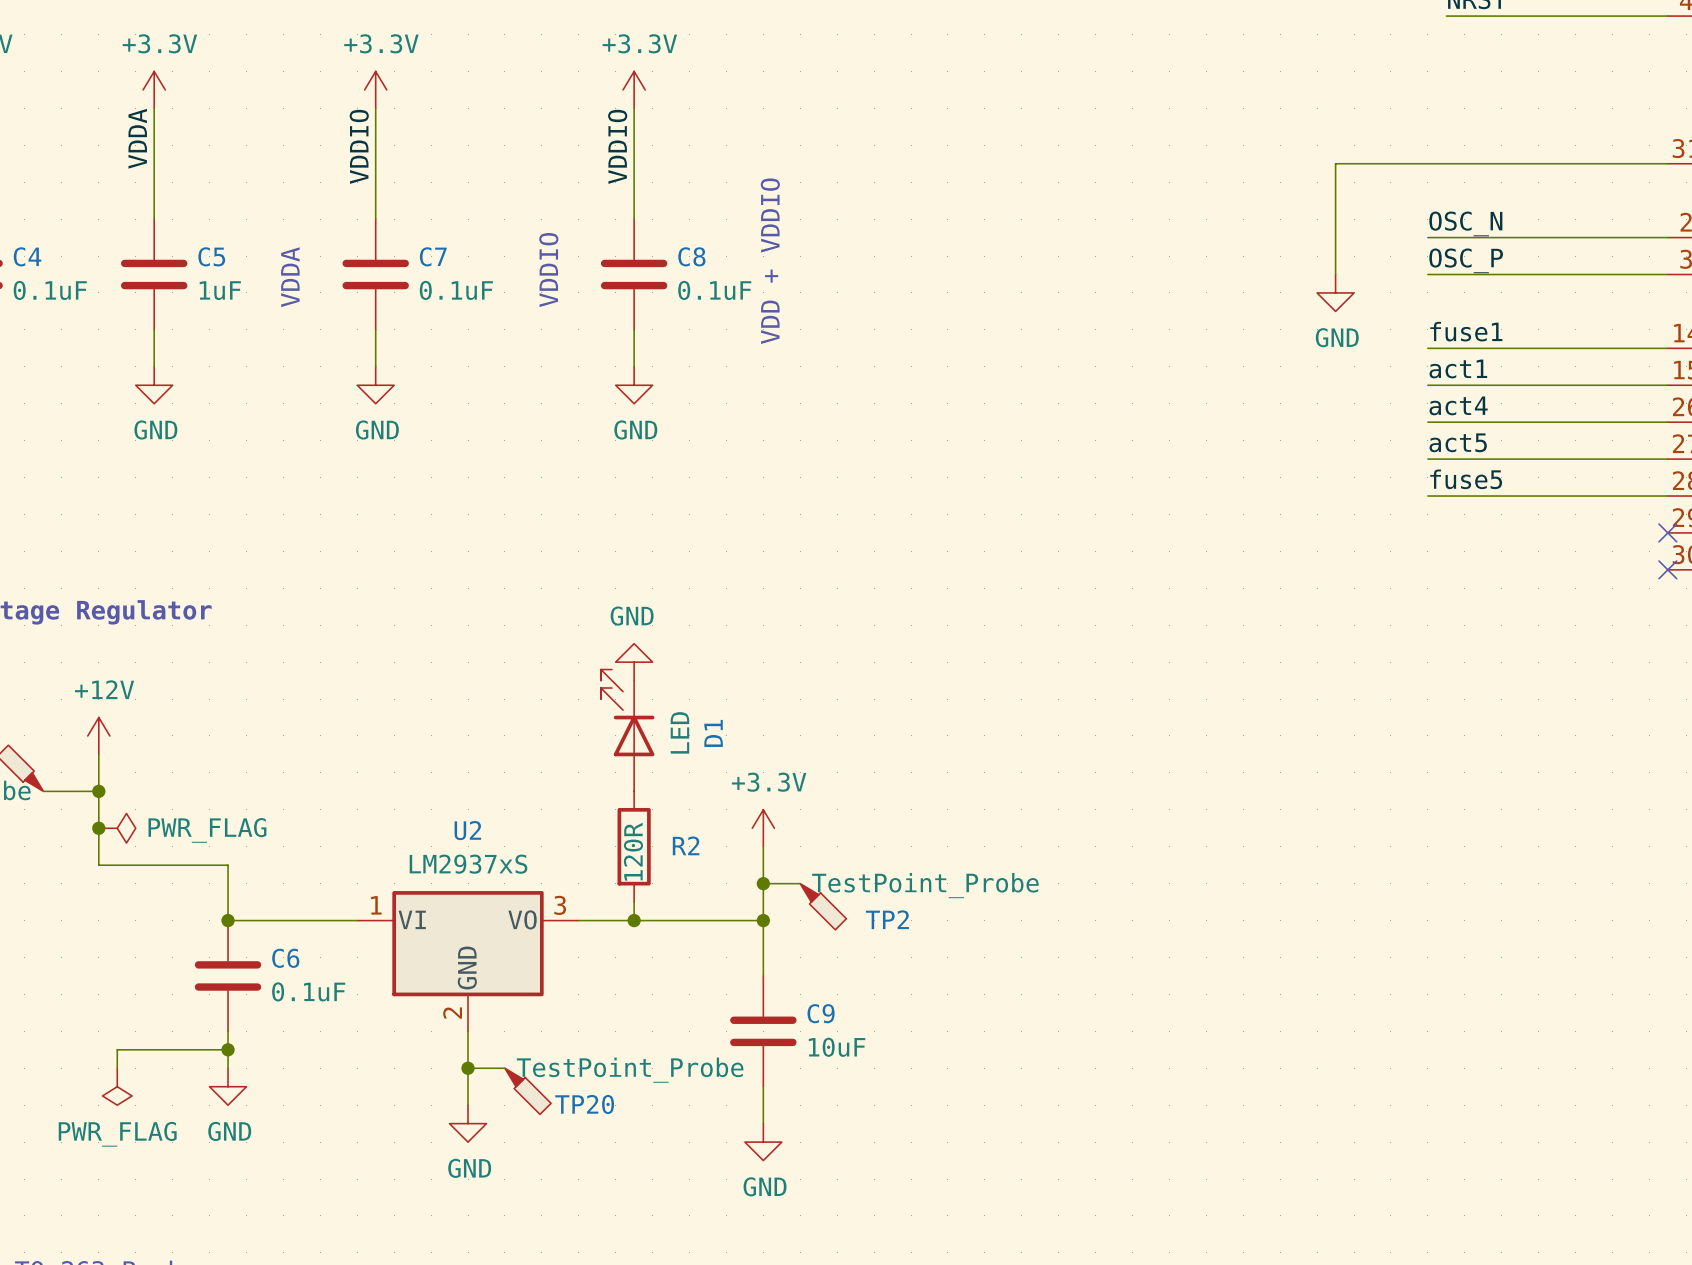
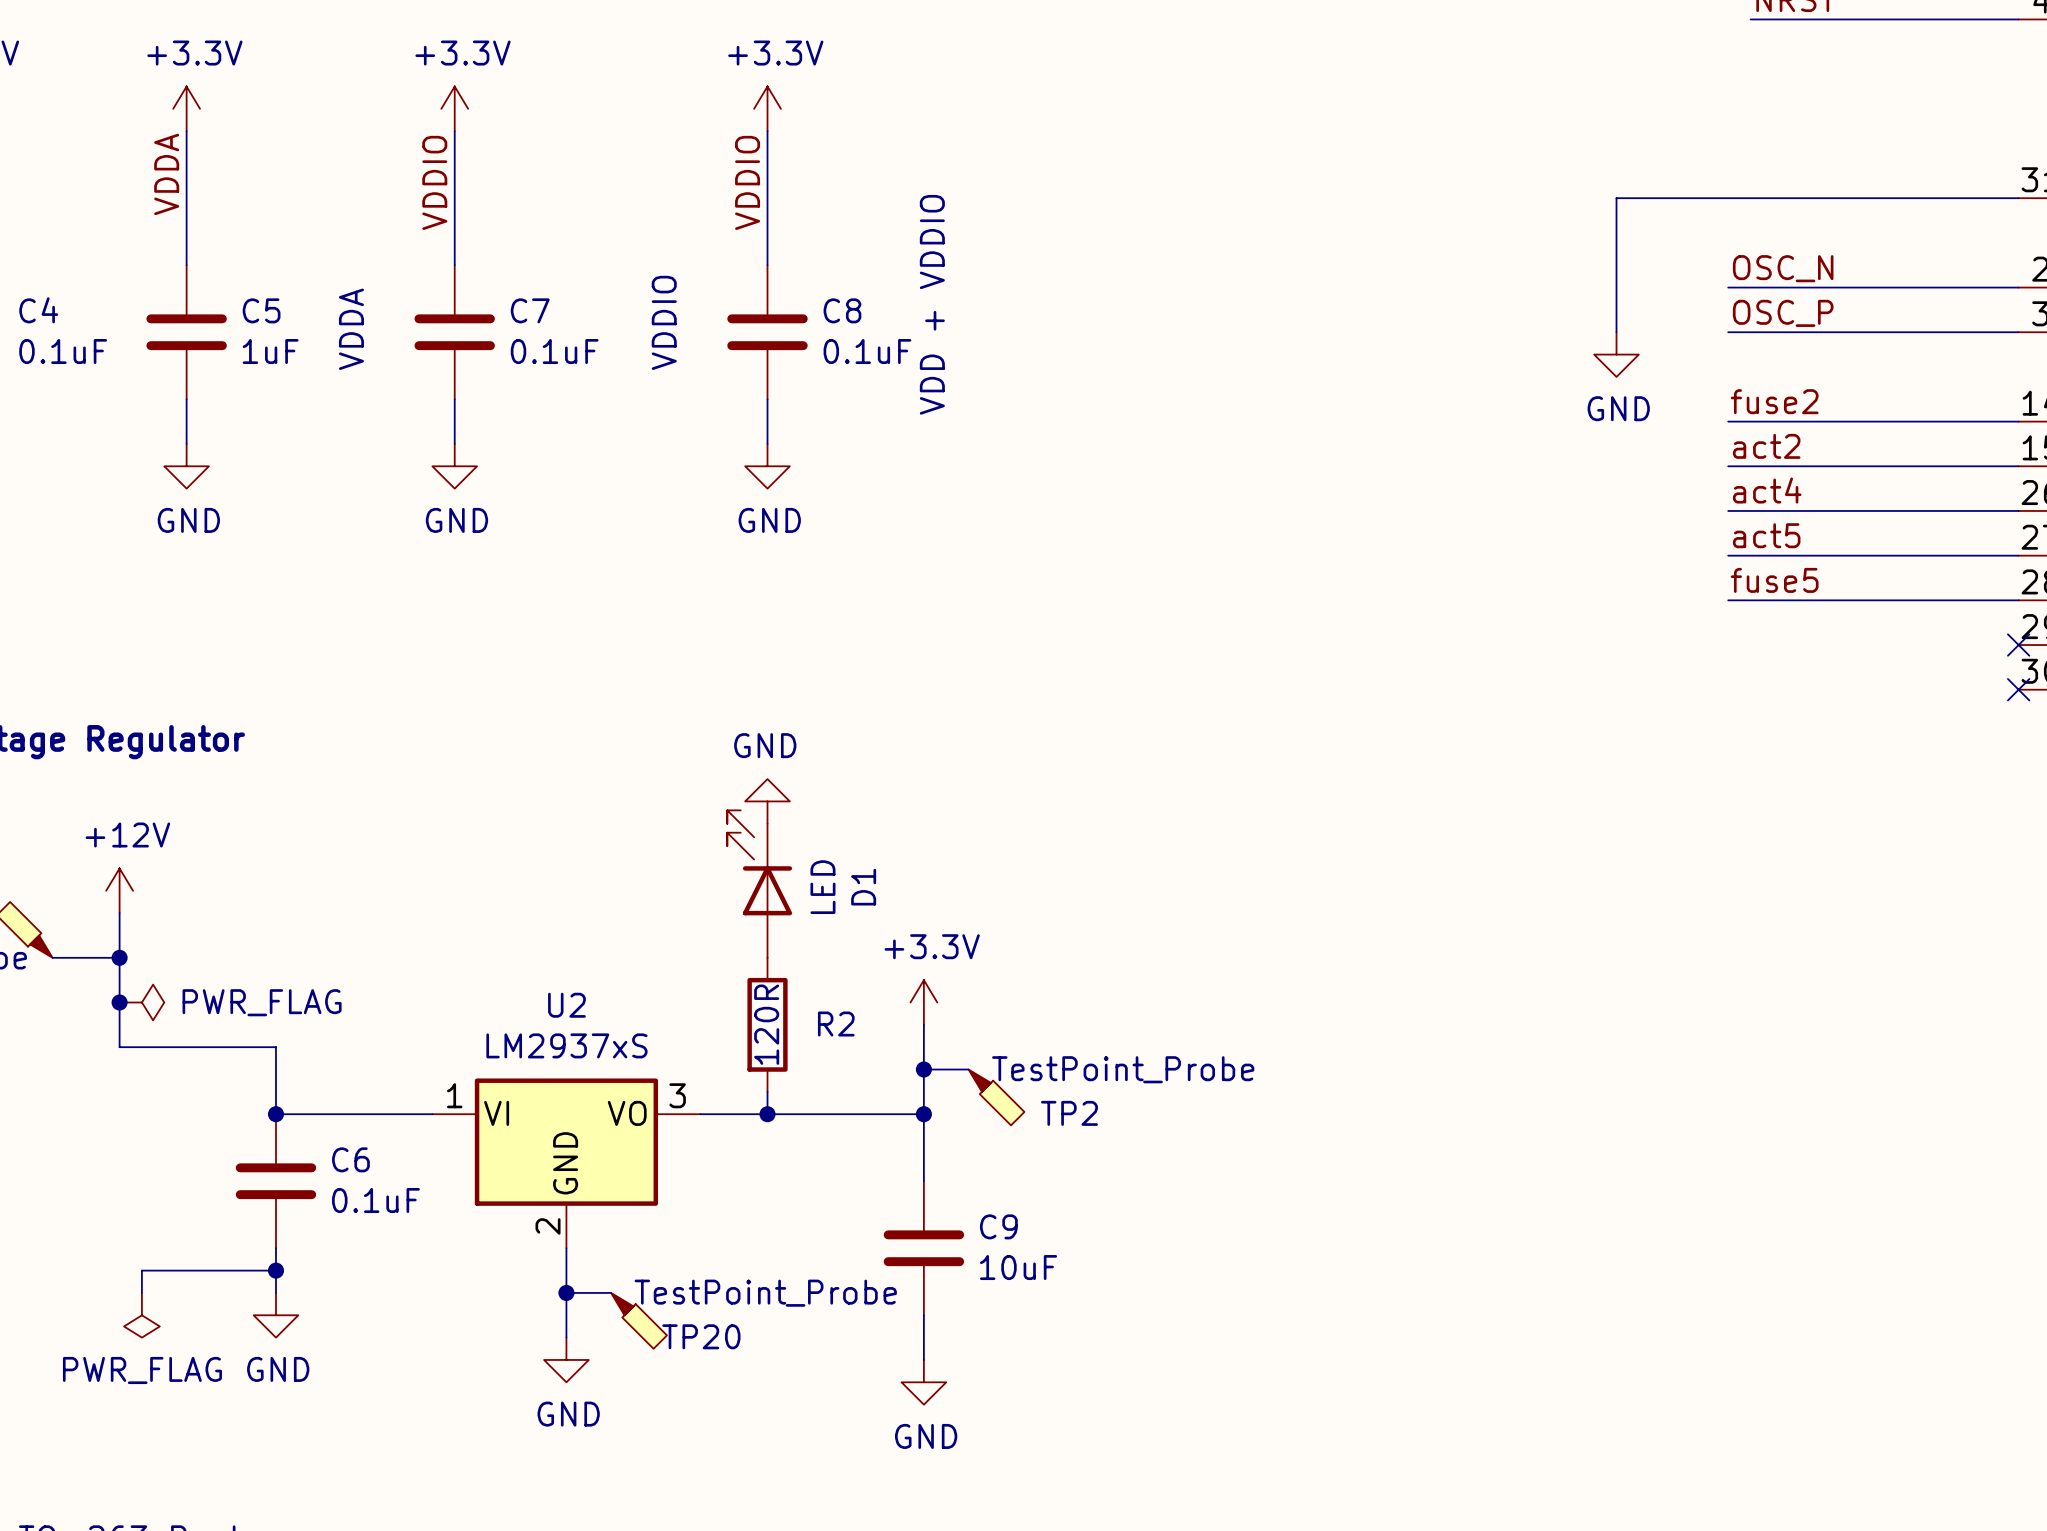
label: fuse1 (1466, 331) -> fuse2 (1774, 401)
label: act1 (1458, 368) -> act2 (1766, 446)

